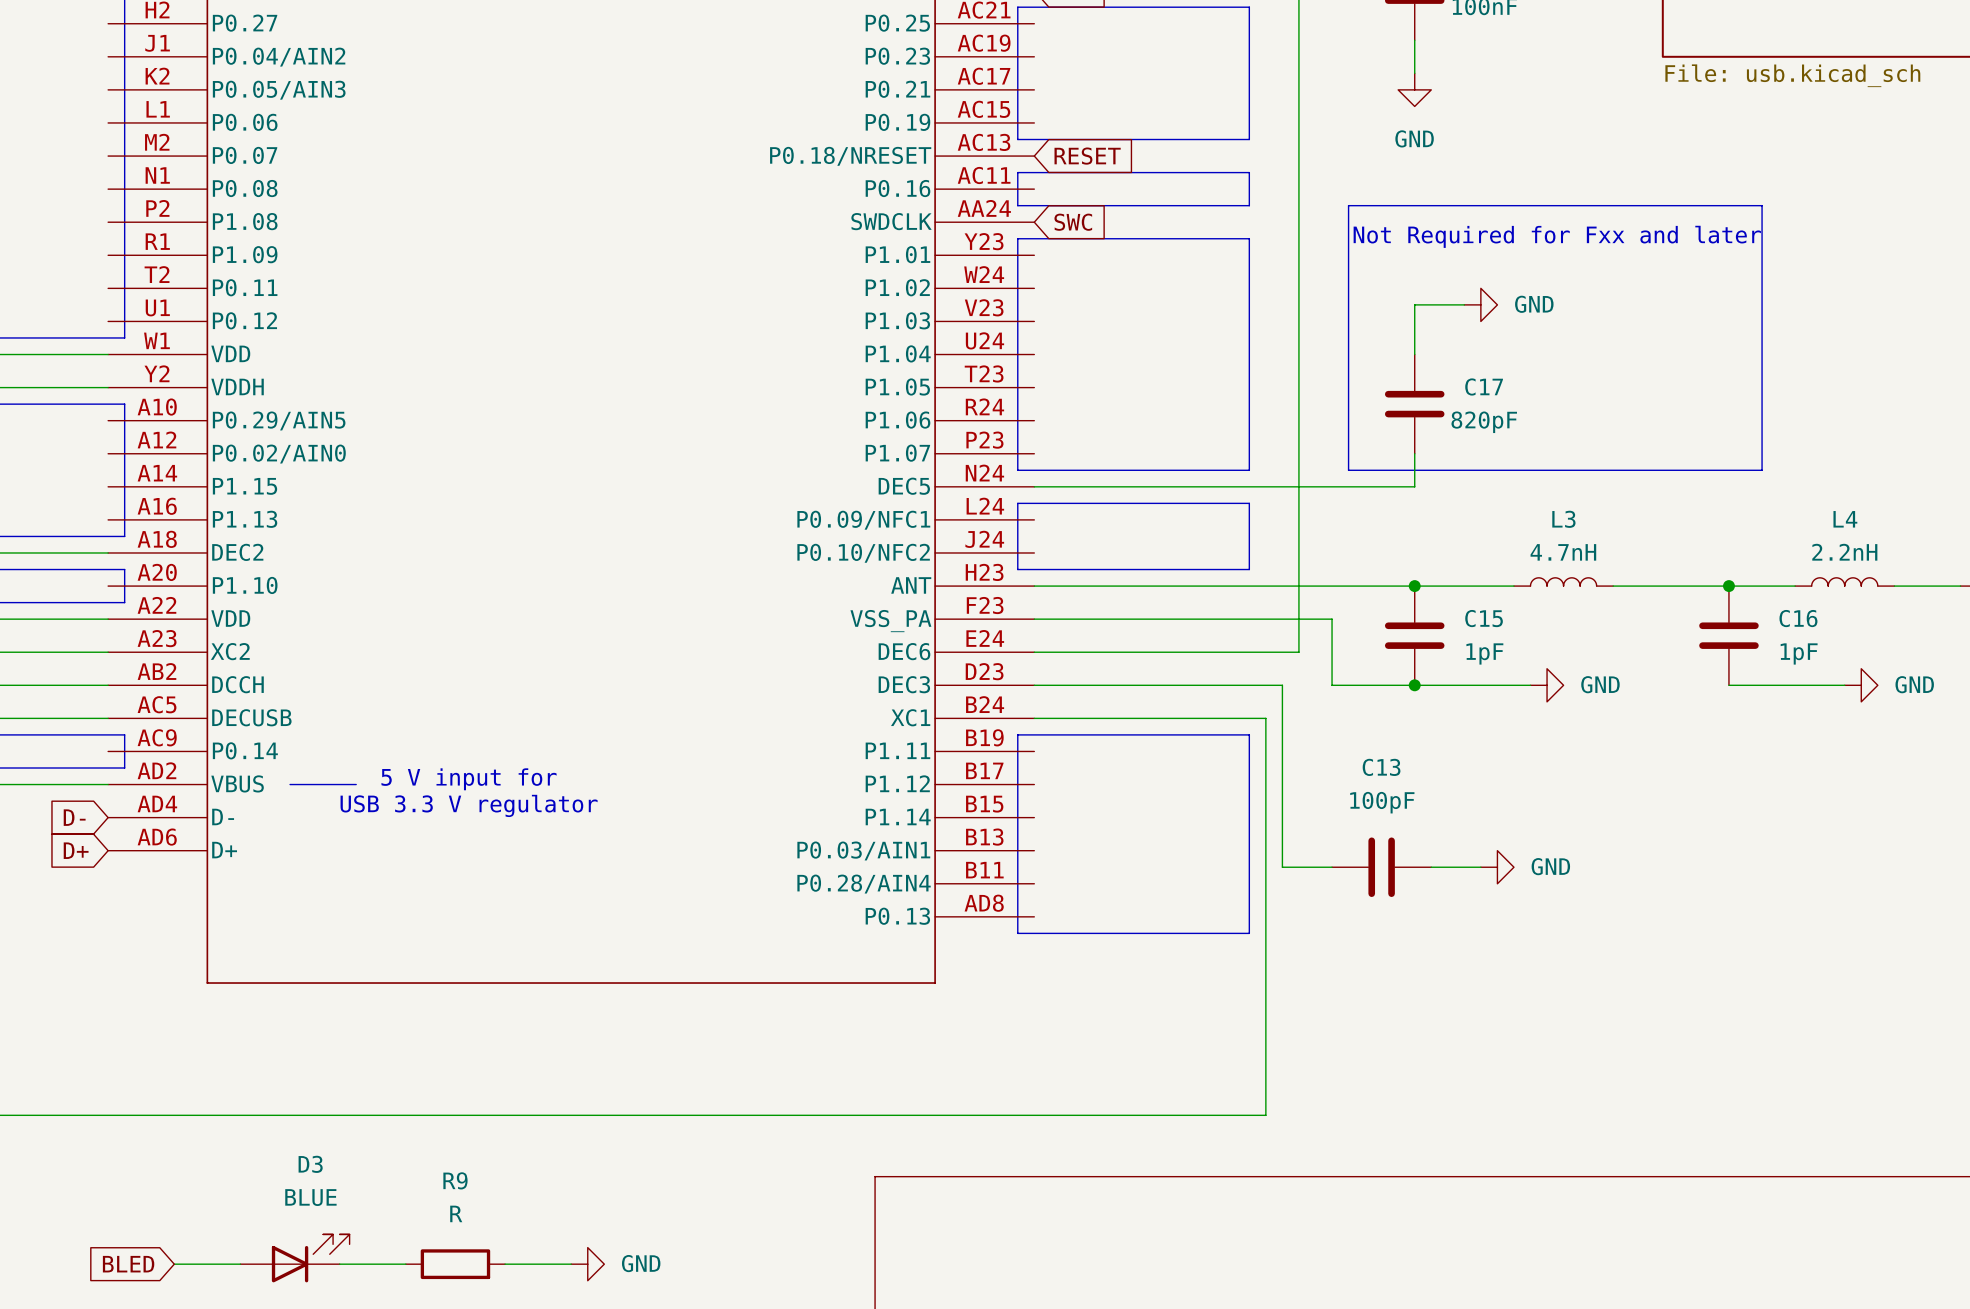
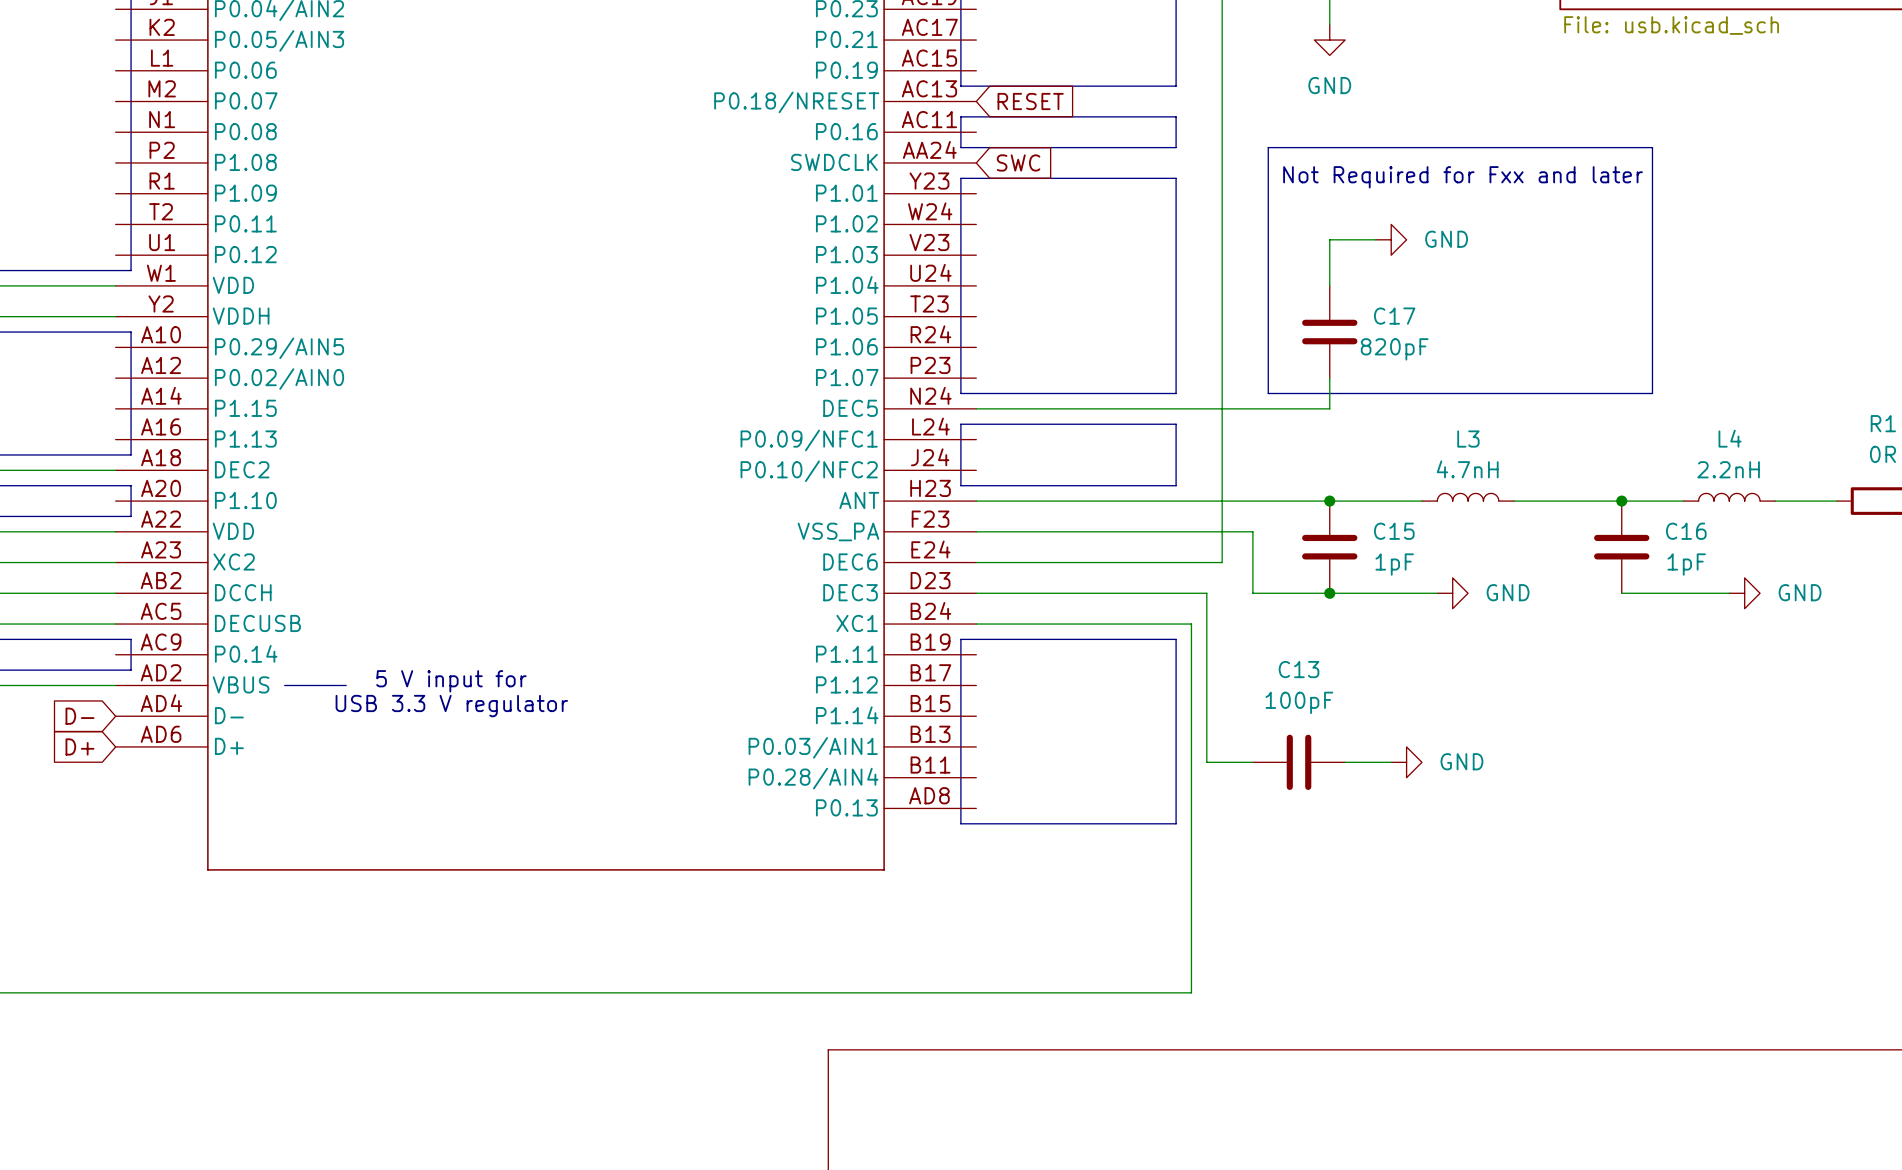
D3: BLUE (295, 1258) -> none
global label: BLED (128, 1264) -> none
wire: (174, 1264) (240, 1264) -> none
wire: (339, 1264) (405, 1264) -> none
R9: R (455, 1264) -> none
wire: (505, 1264) (571, 1264) -> none
power symbol: GND (587, 1264) -> none

